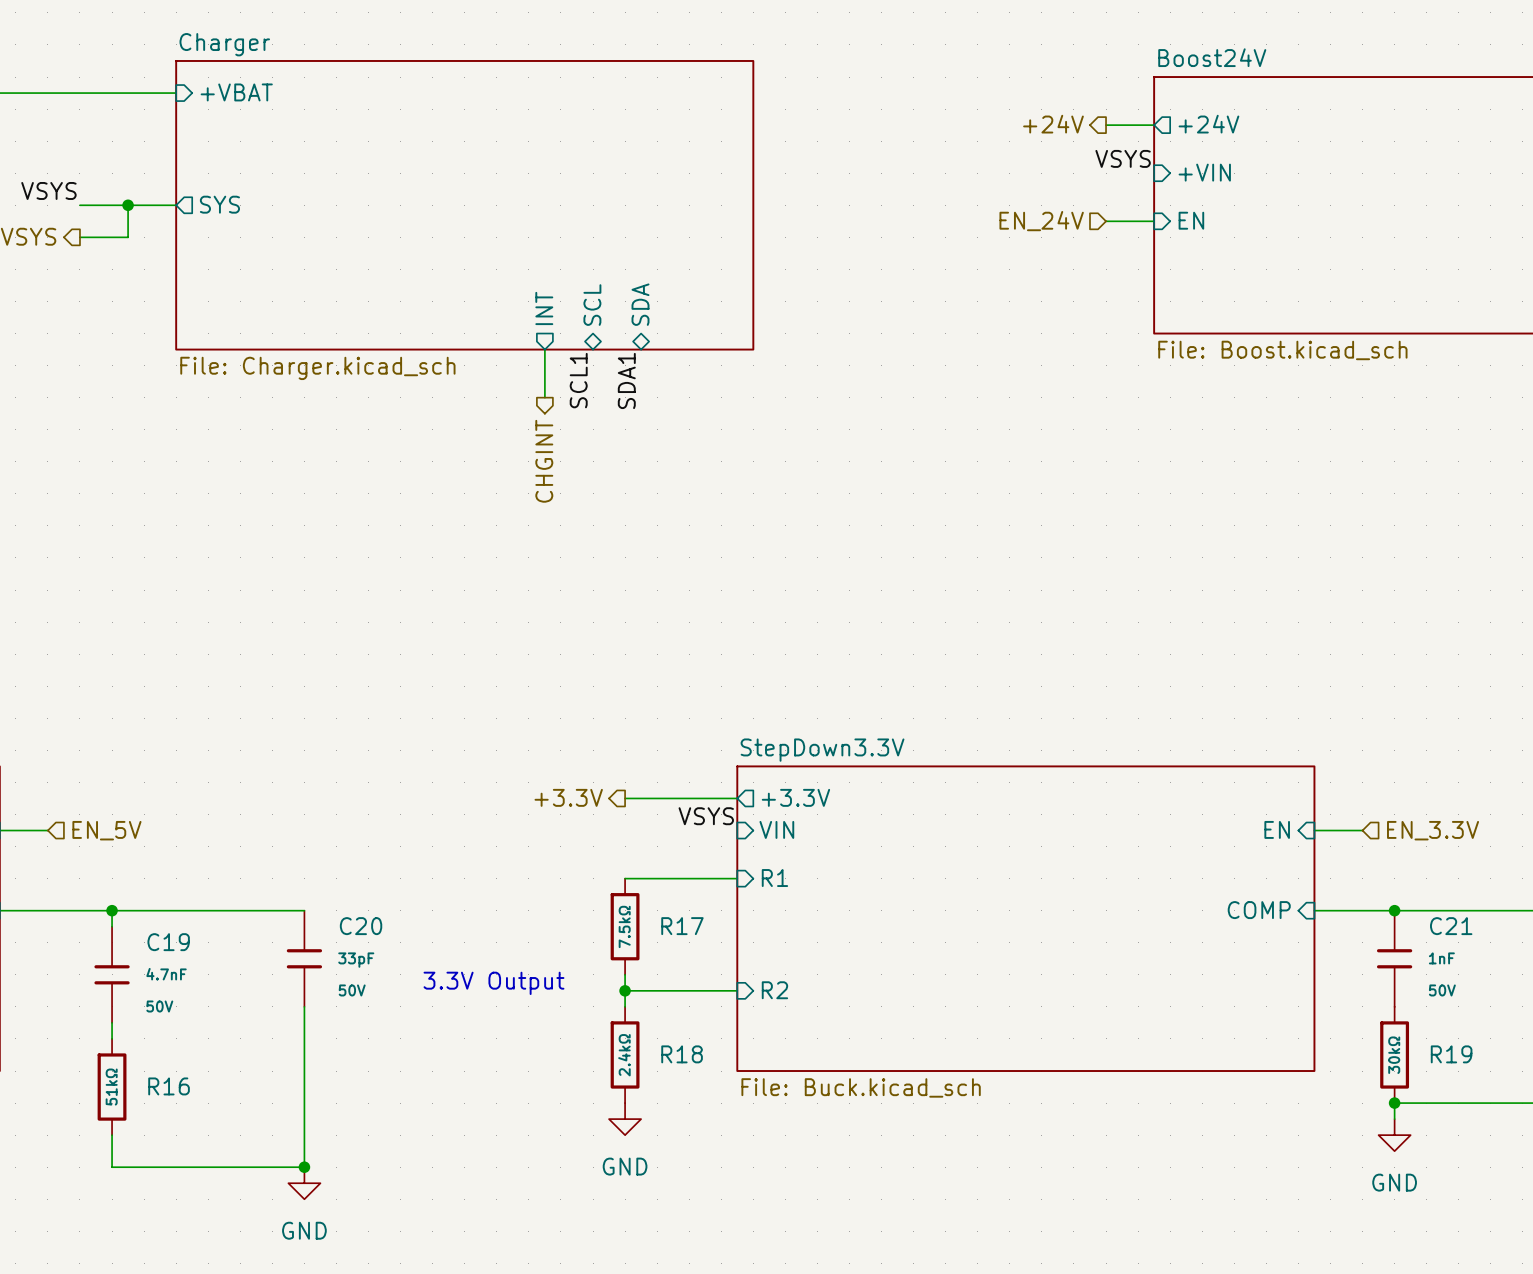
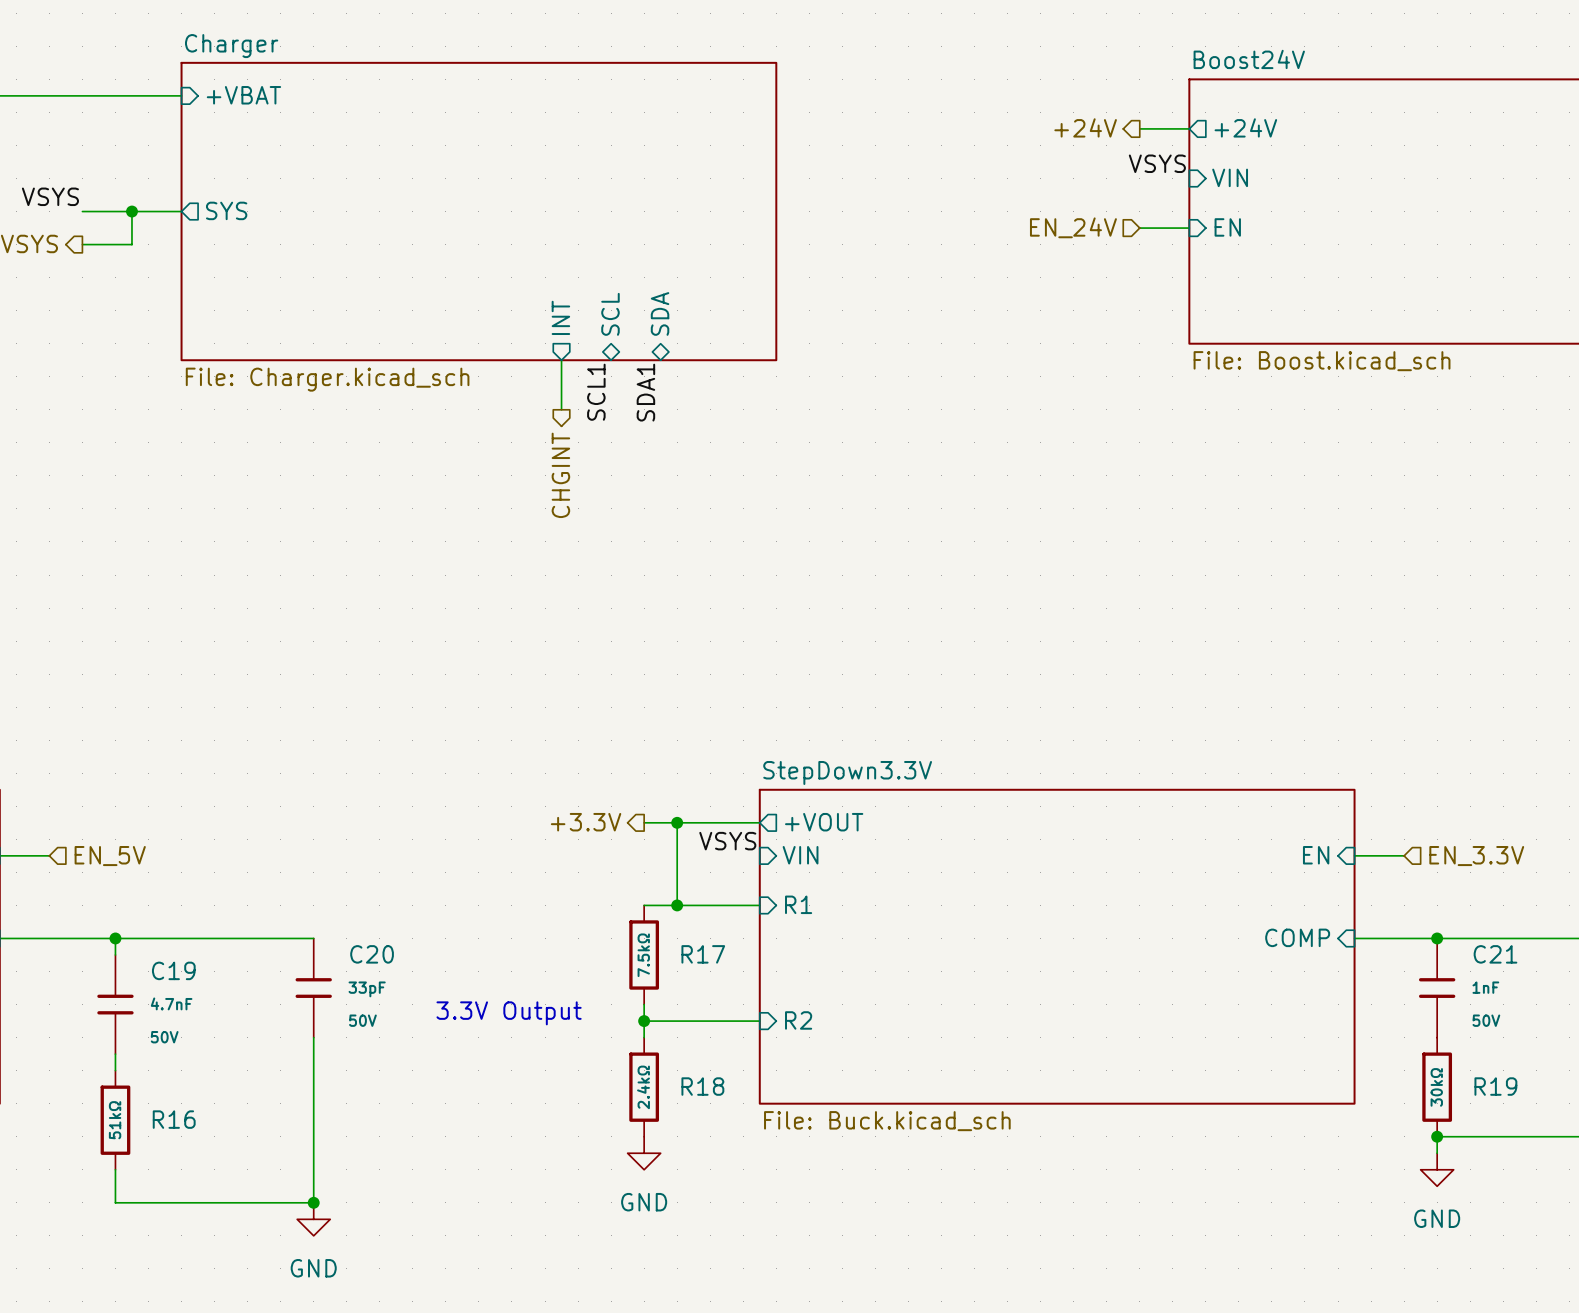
sheet pin: +VIN (1204, 172) -> VIN (1230, 177)
sheet pin: +3.3V (795, 797) -> +VOUT (824, 822)
wire: none -> (677, 822) (677, 905)
junction: none -> (677, 822)
junction: none -> (677, 905)

